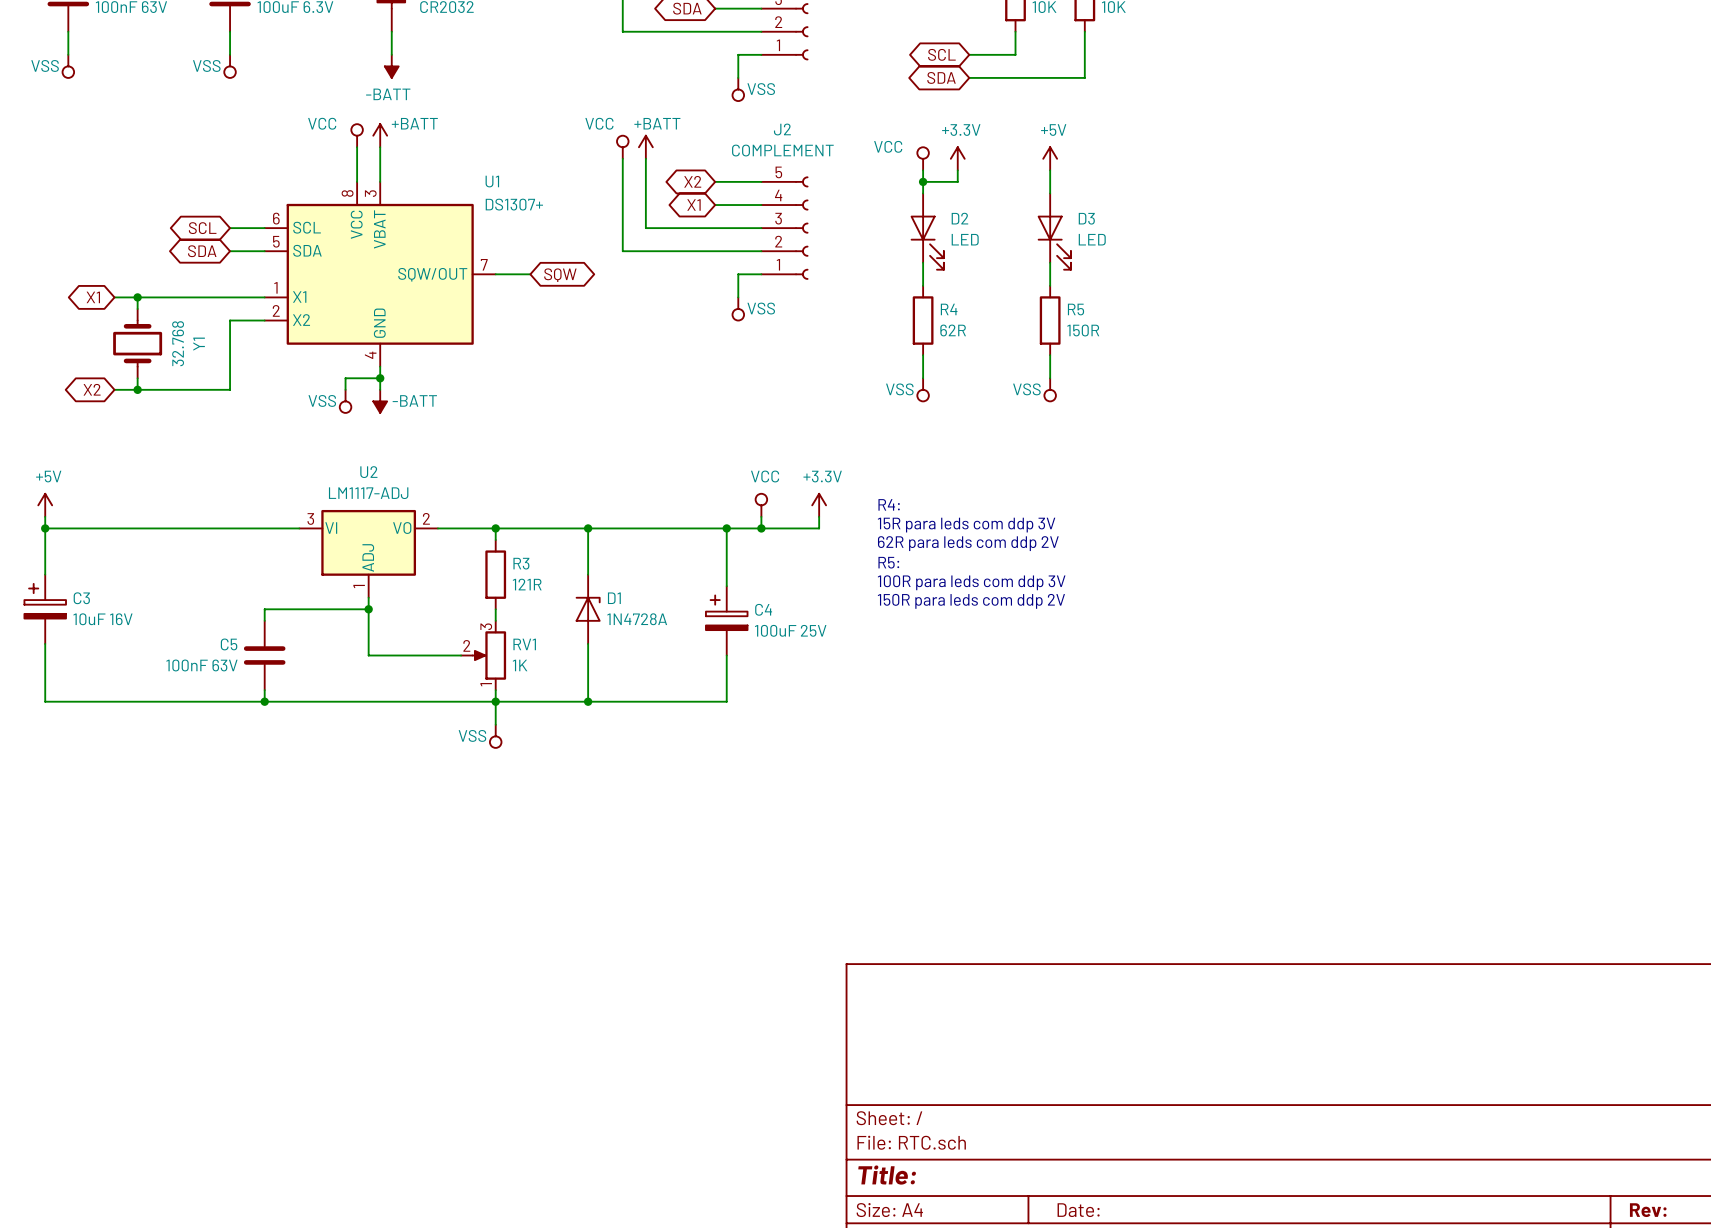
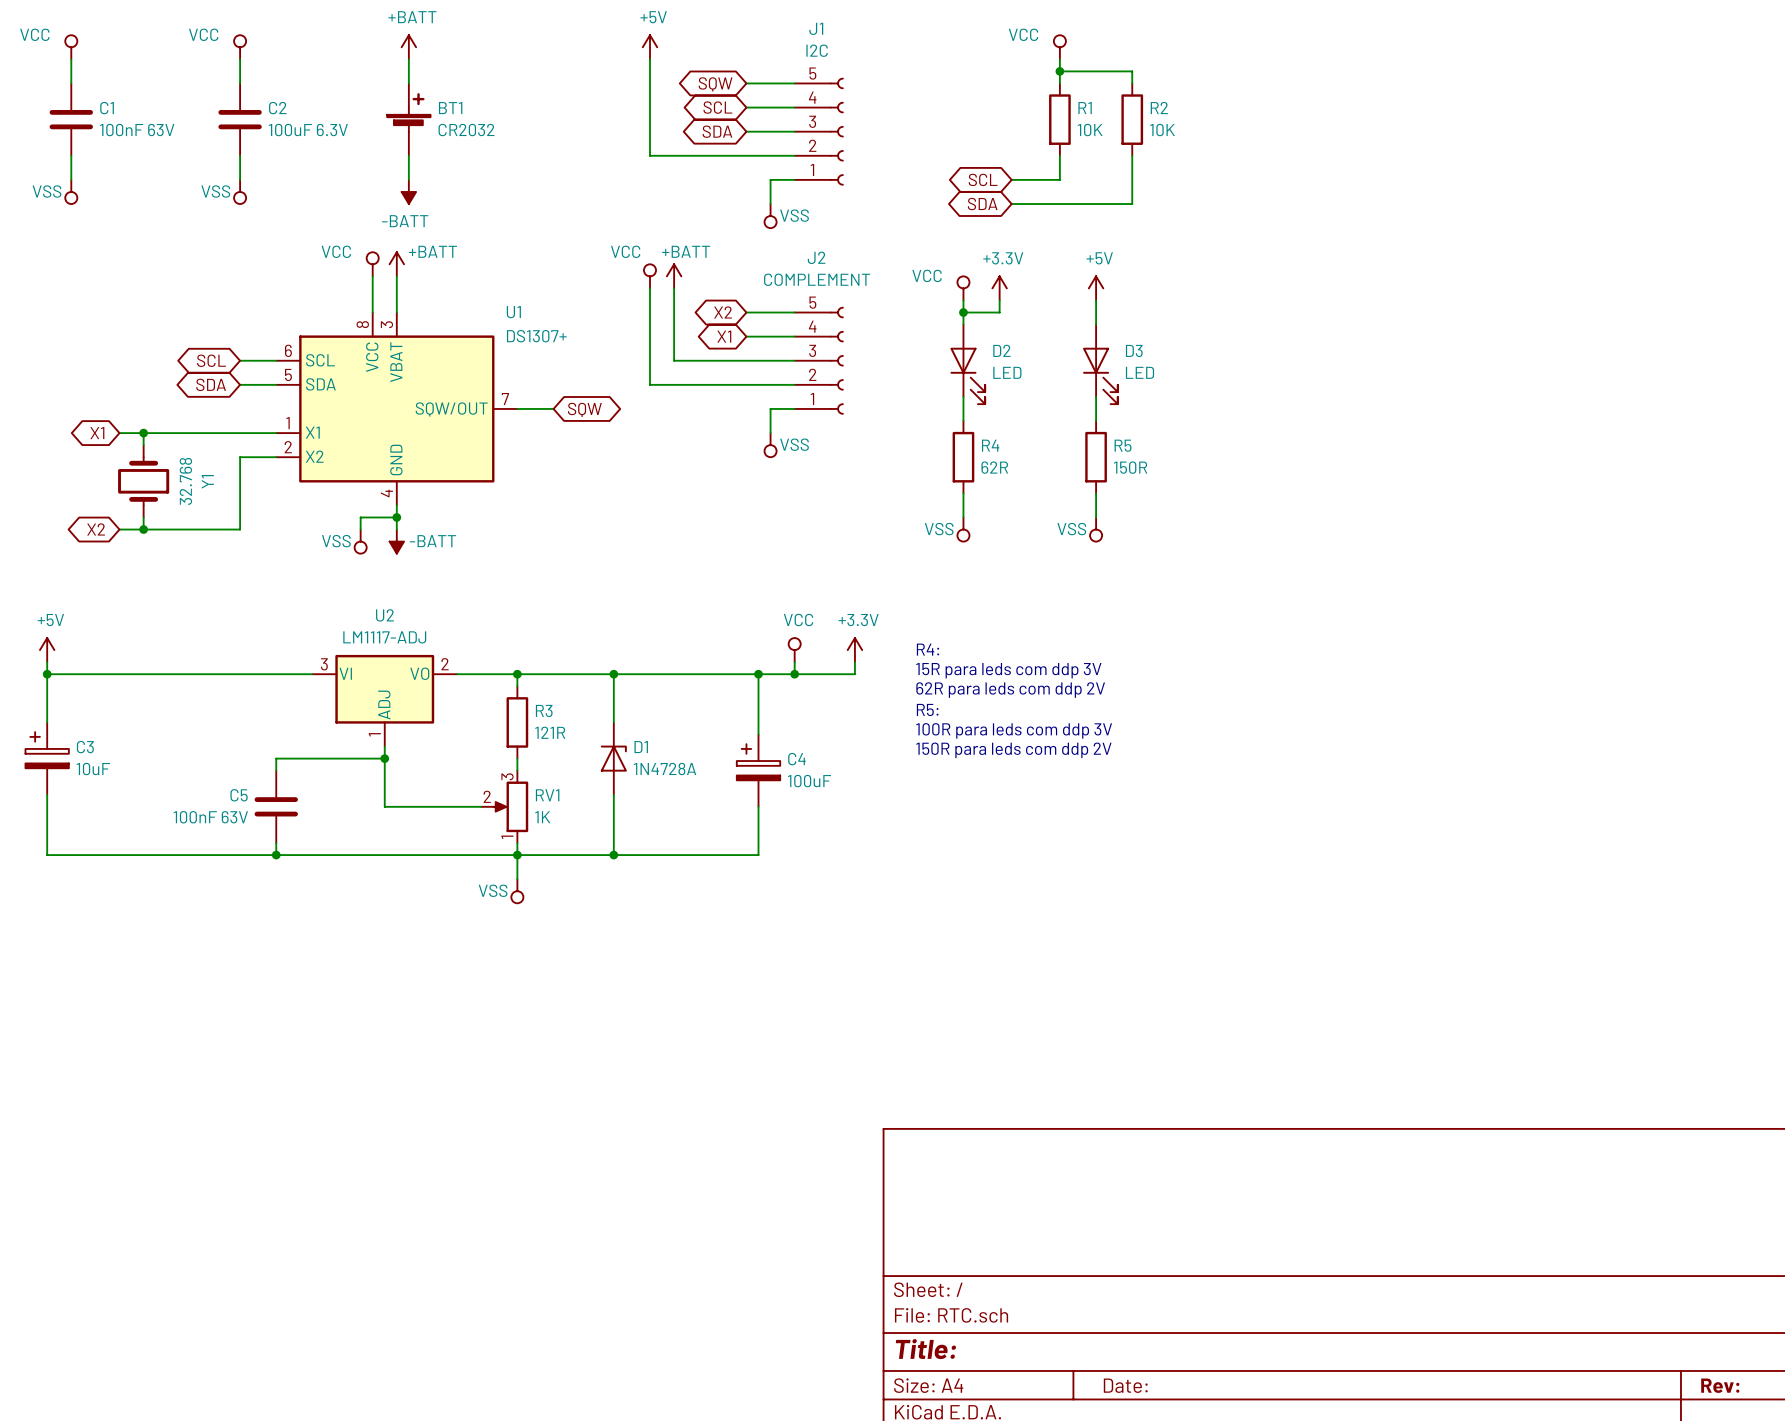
C3 value: 10uF 16V (102, 619) -> 10uF (93, 769)
C4 value: 100uF 25V (790, 630) -> 100uF (809, 781)

